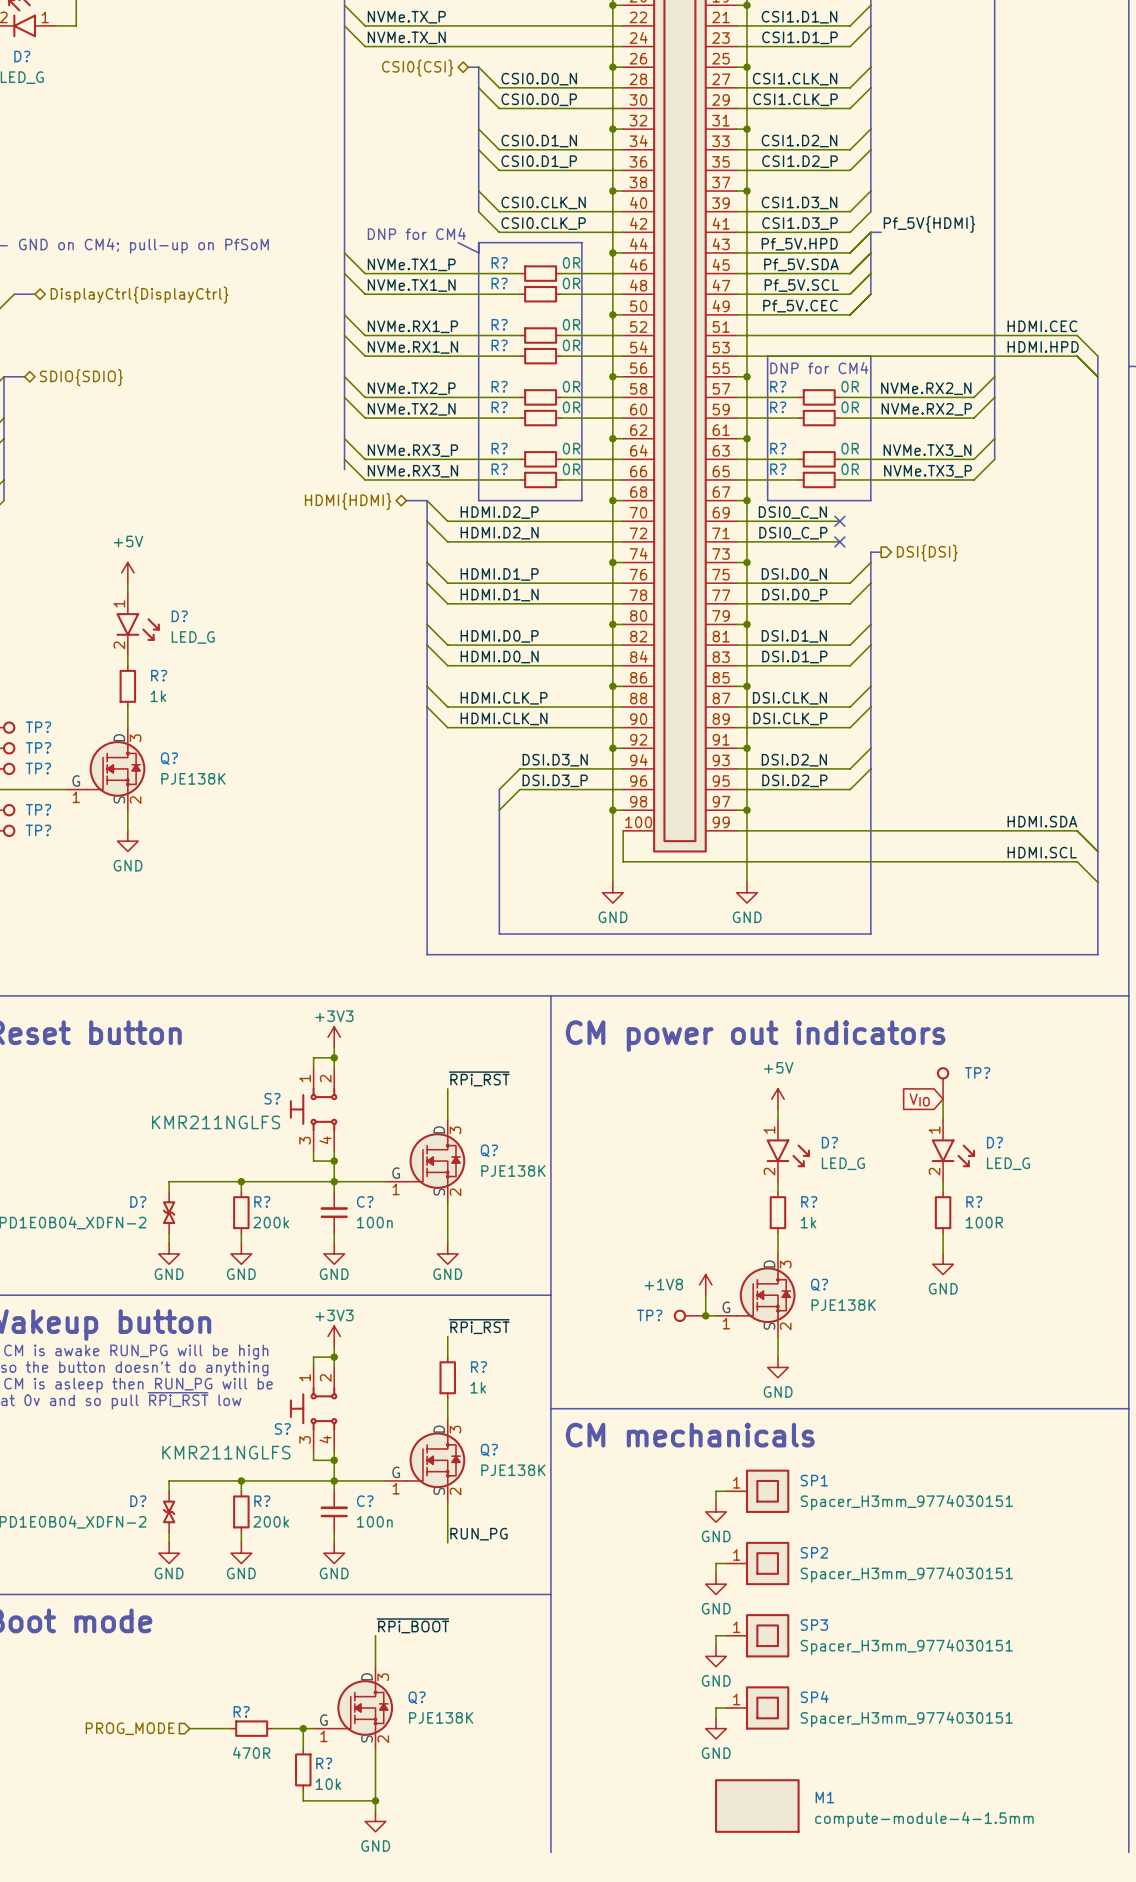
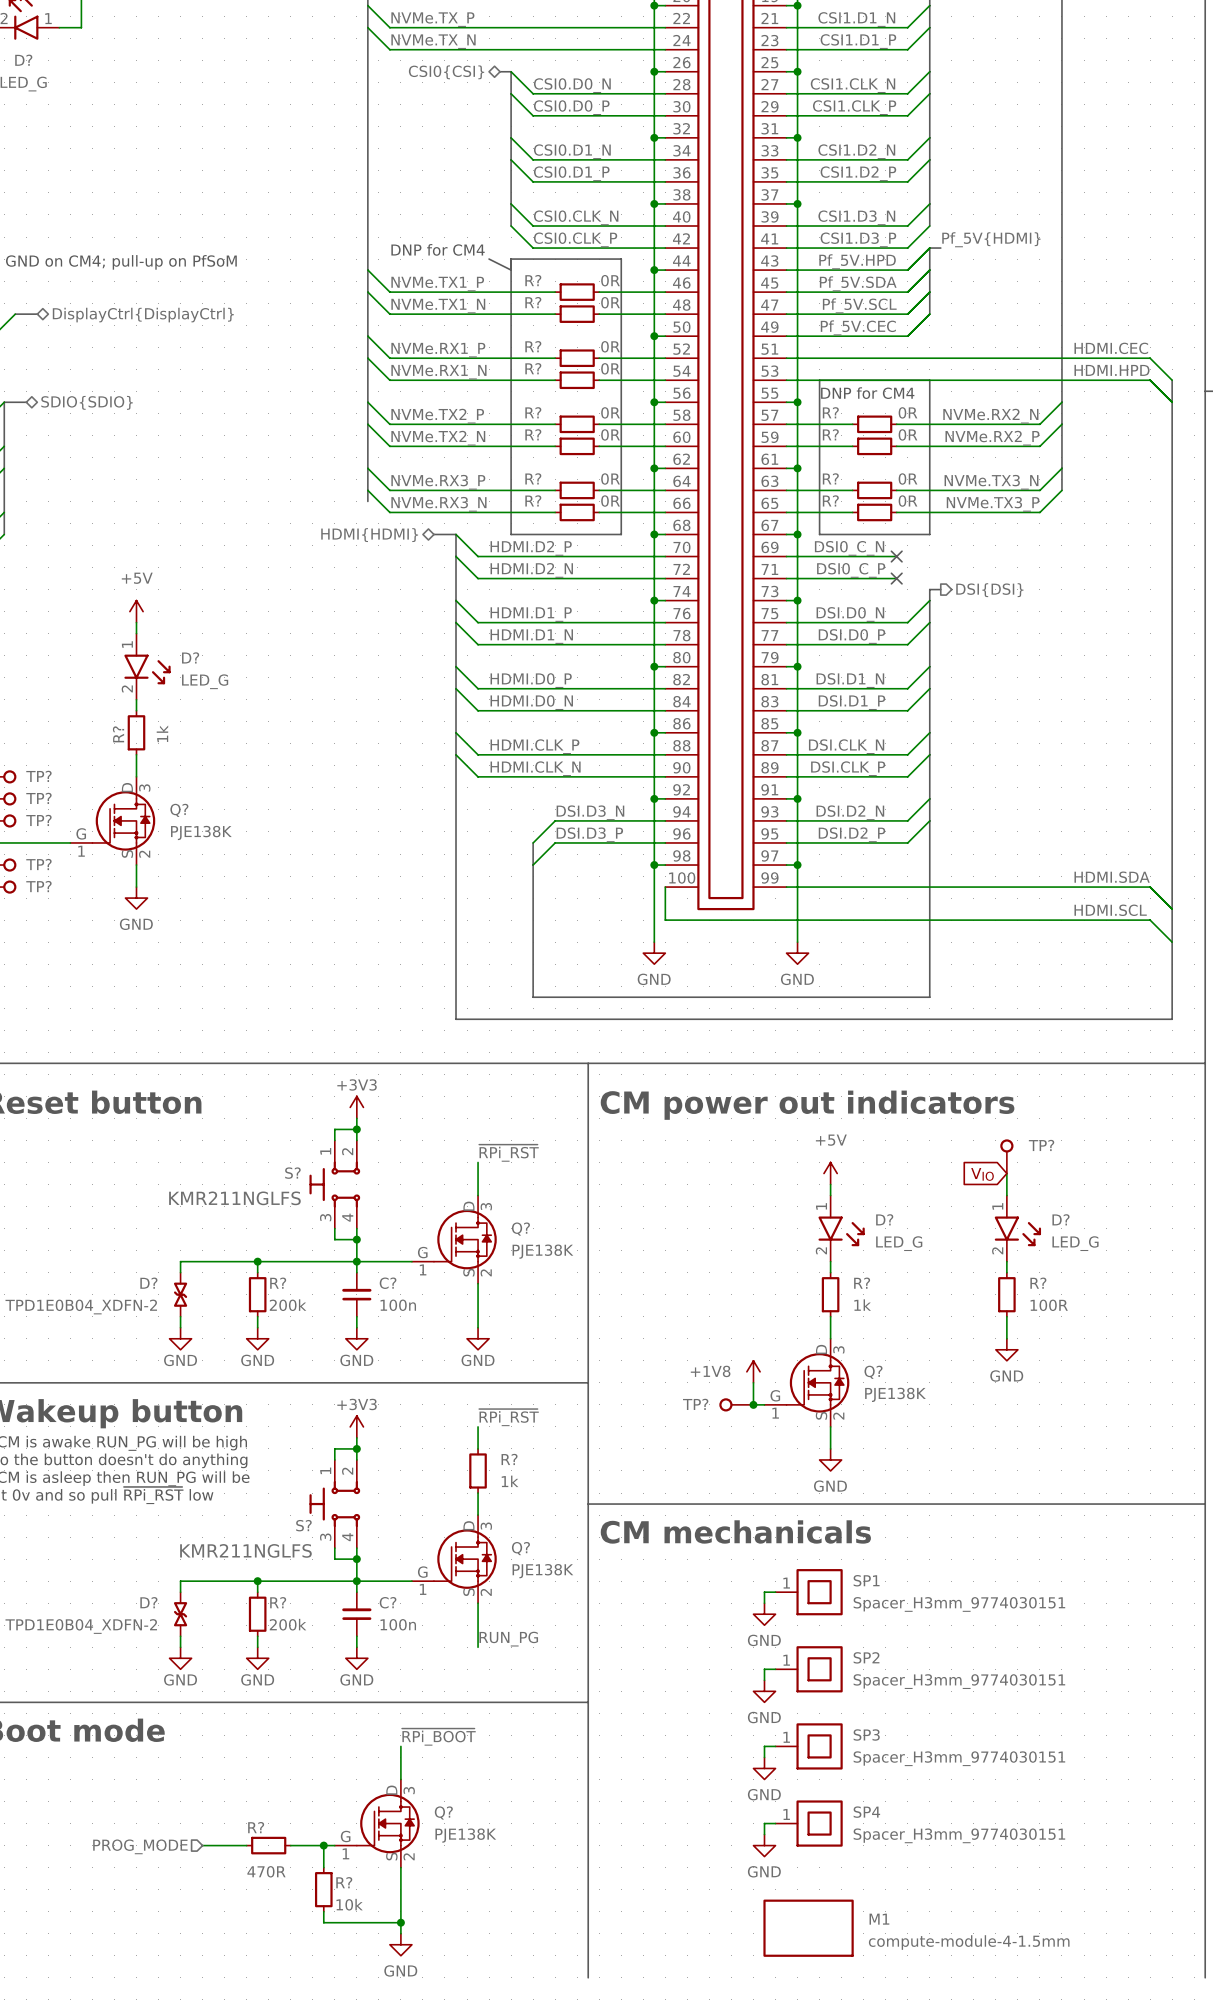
R? name rotation: 0° (159, 675) -> 90° counterclockwise (118, 734)
R? name position: R? (159, 675) -> R? (118, 734)
R? text rotation: 0° (158, 696) -> 90° counterclockwise (162, 733)

